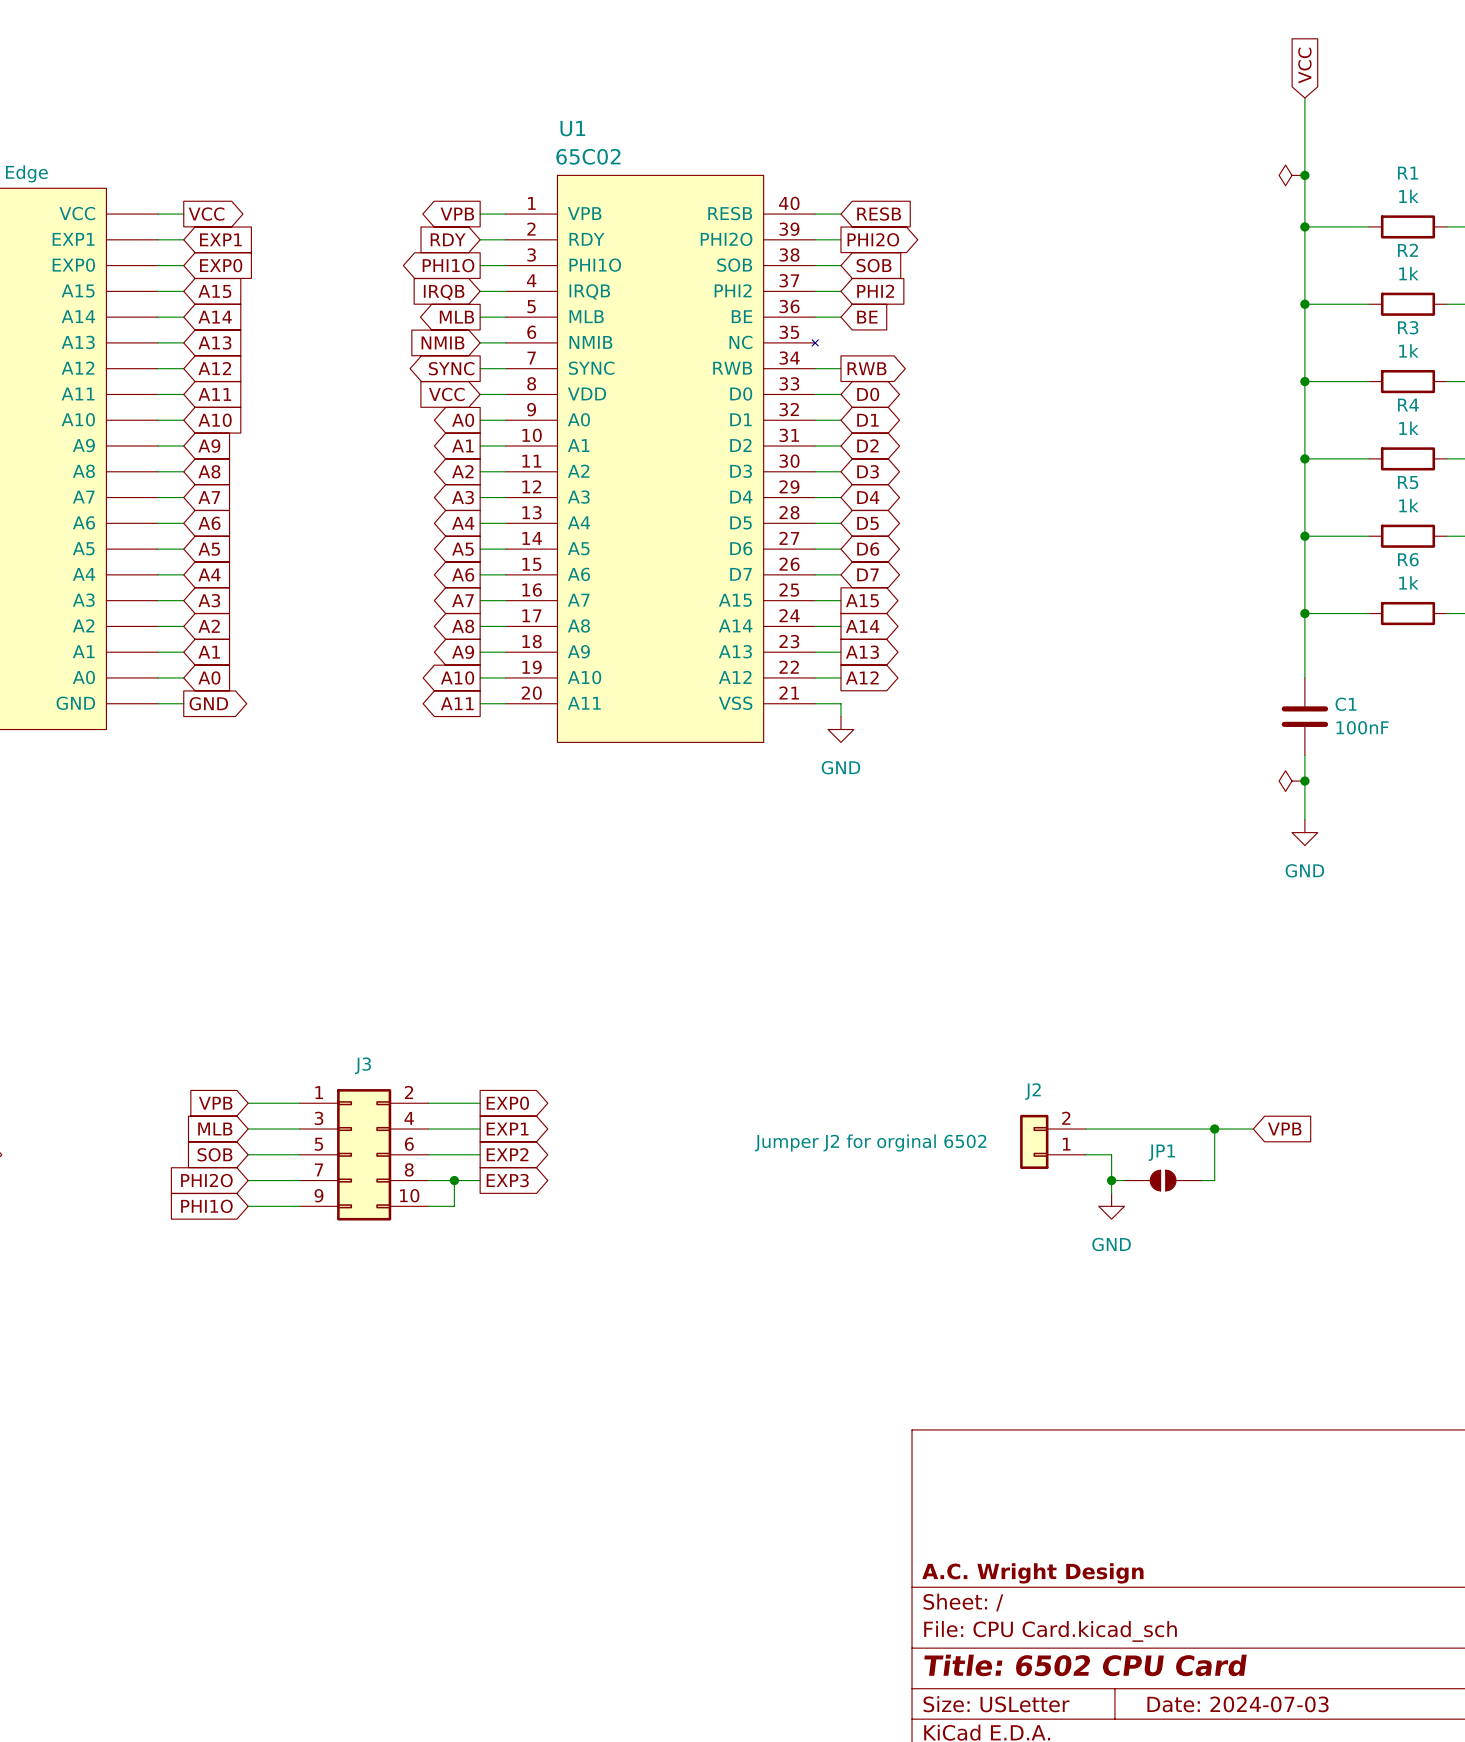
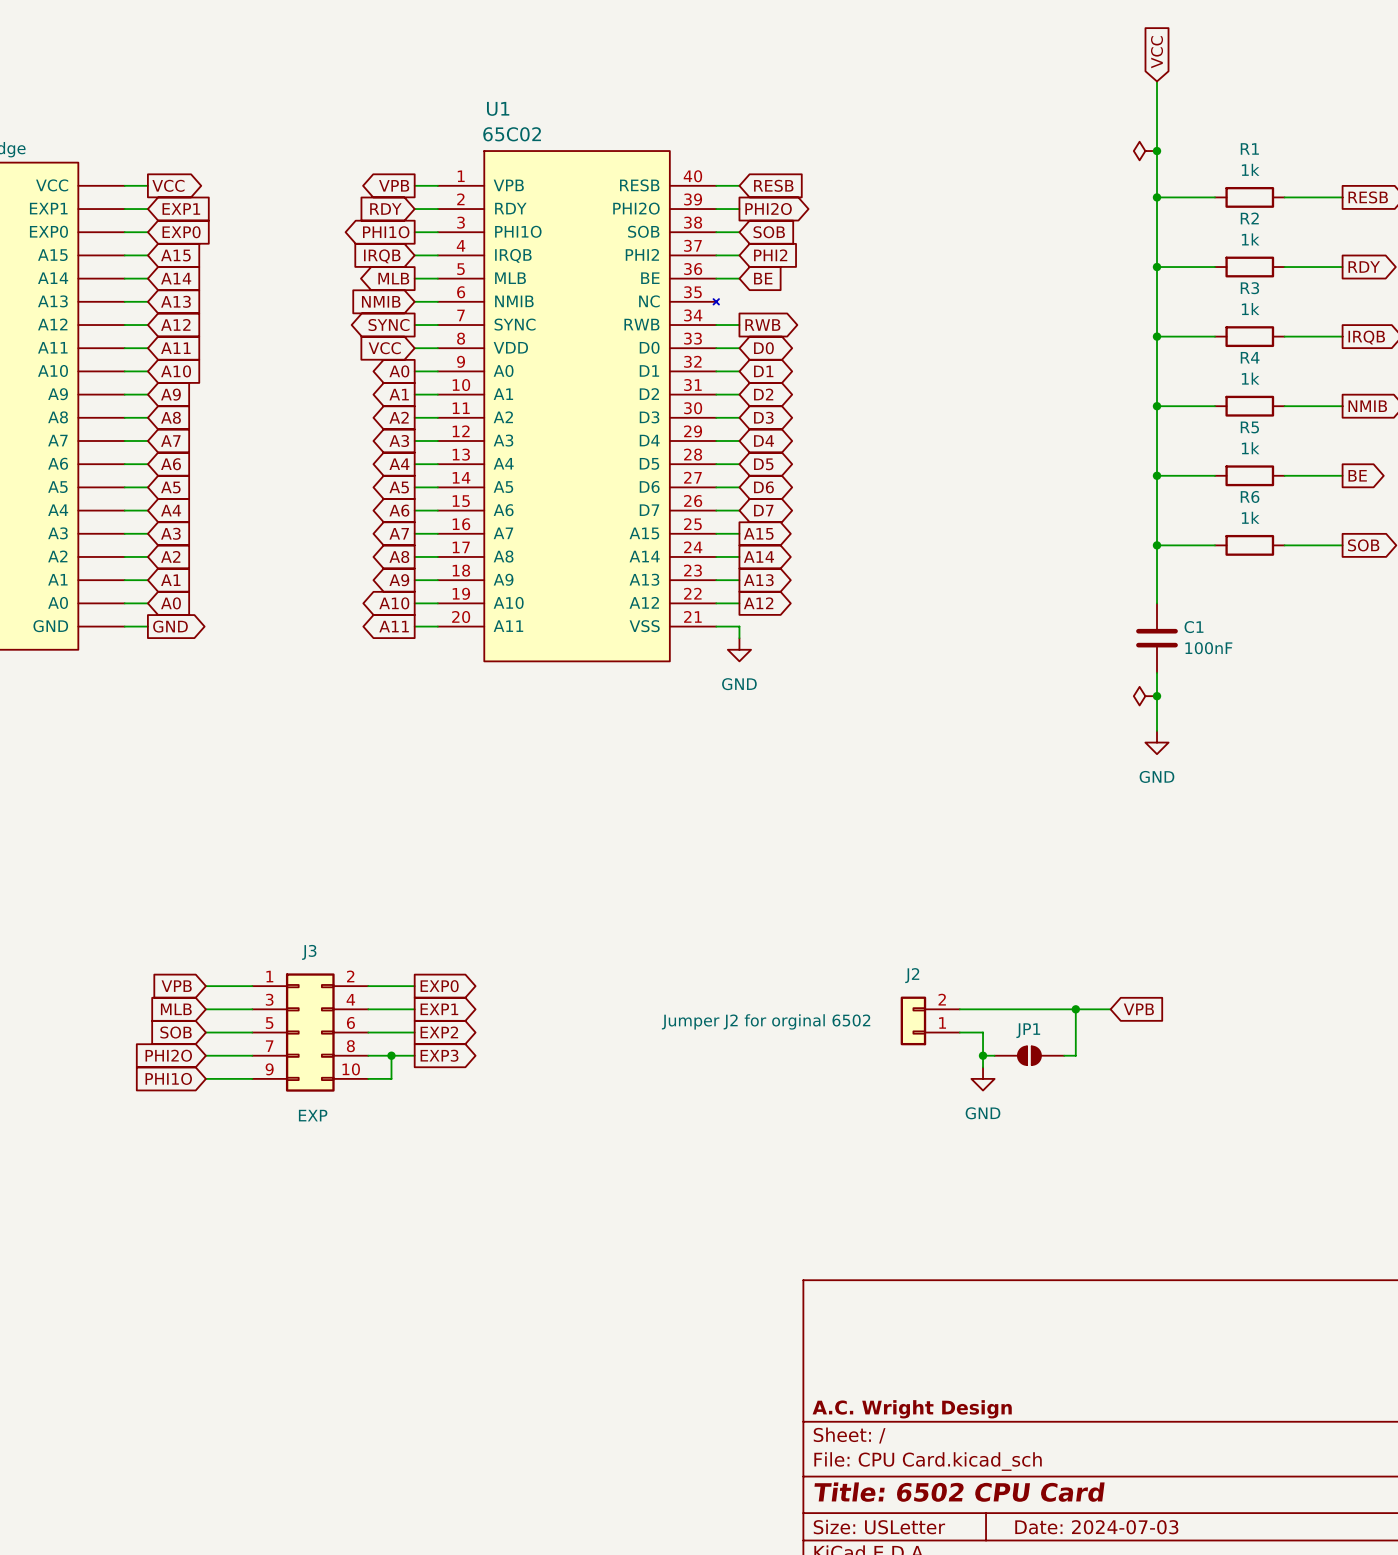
J3 value: none -> EXP (313, 1115)

